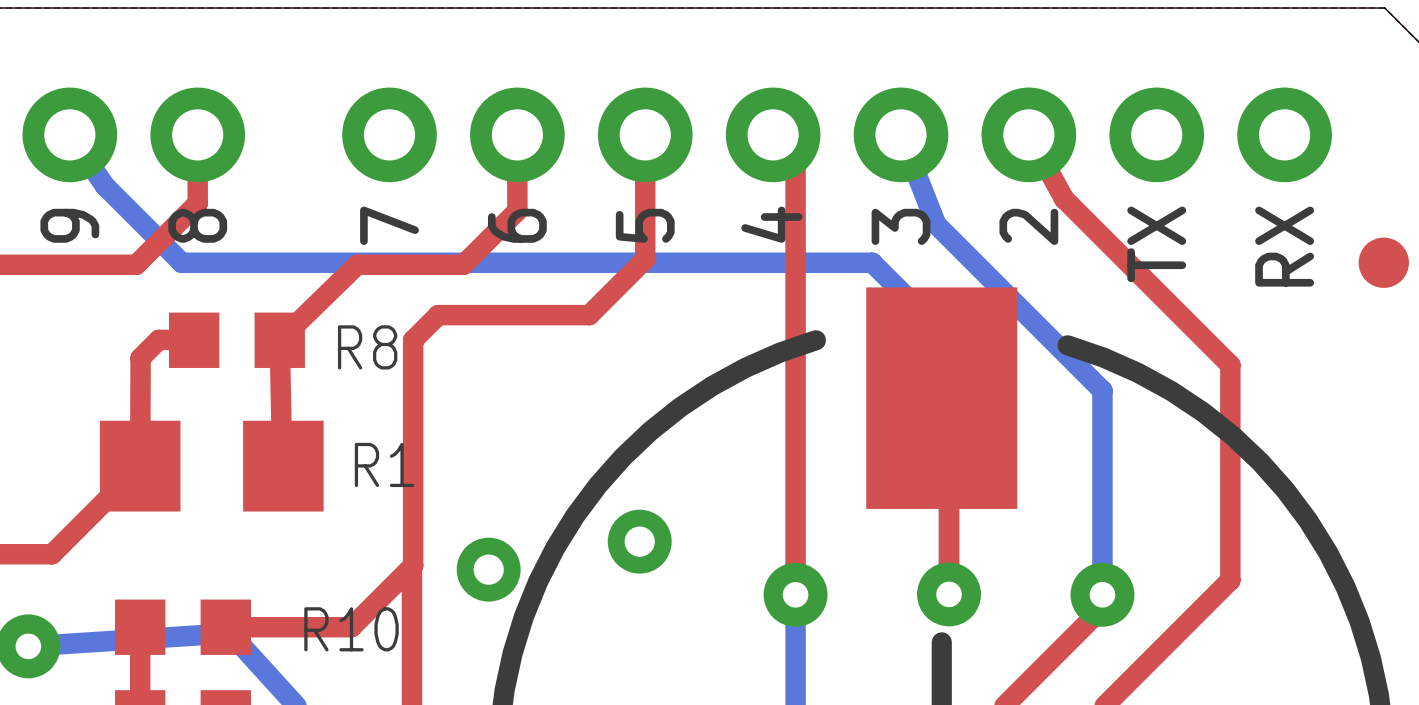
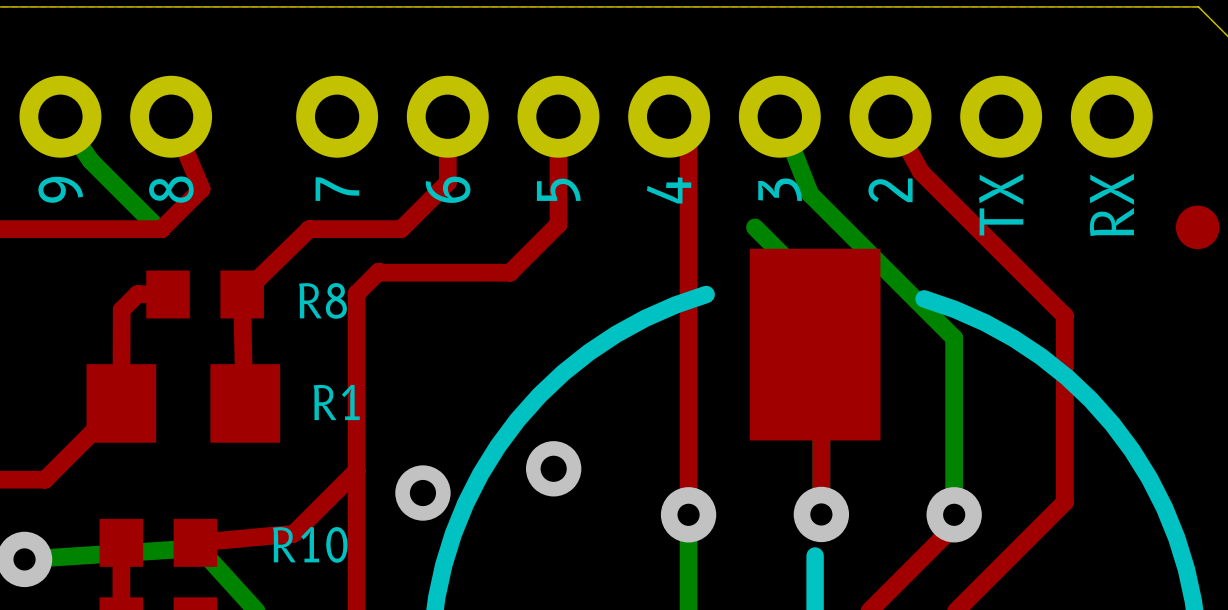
top track: (197, 134) (197, 203) (136, 264) -> (171, 116) (201, 189) (161, 229) (117, 229)
bottom track: (181, 262) (872, 262) -> none
top track: (438, 315) (413, 340) (413, 565) (351, 627) (225, 627) -> (379, 272) (356, 293) (356, 490)
top track: none -> (356, 470) (293, 533) (195, 542)

